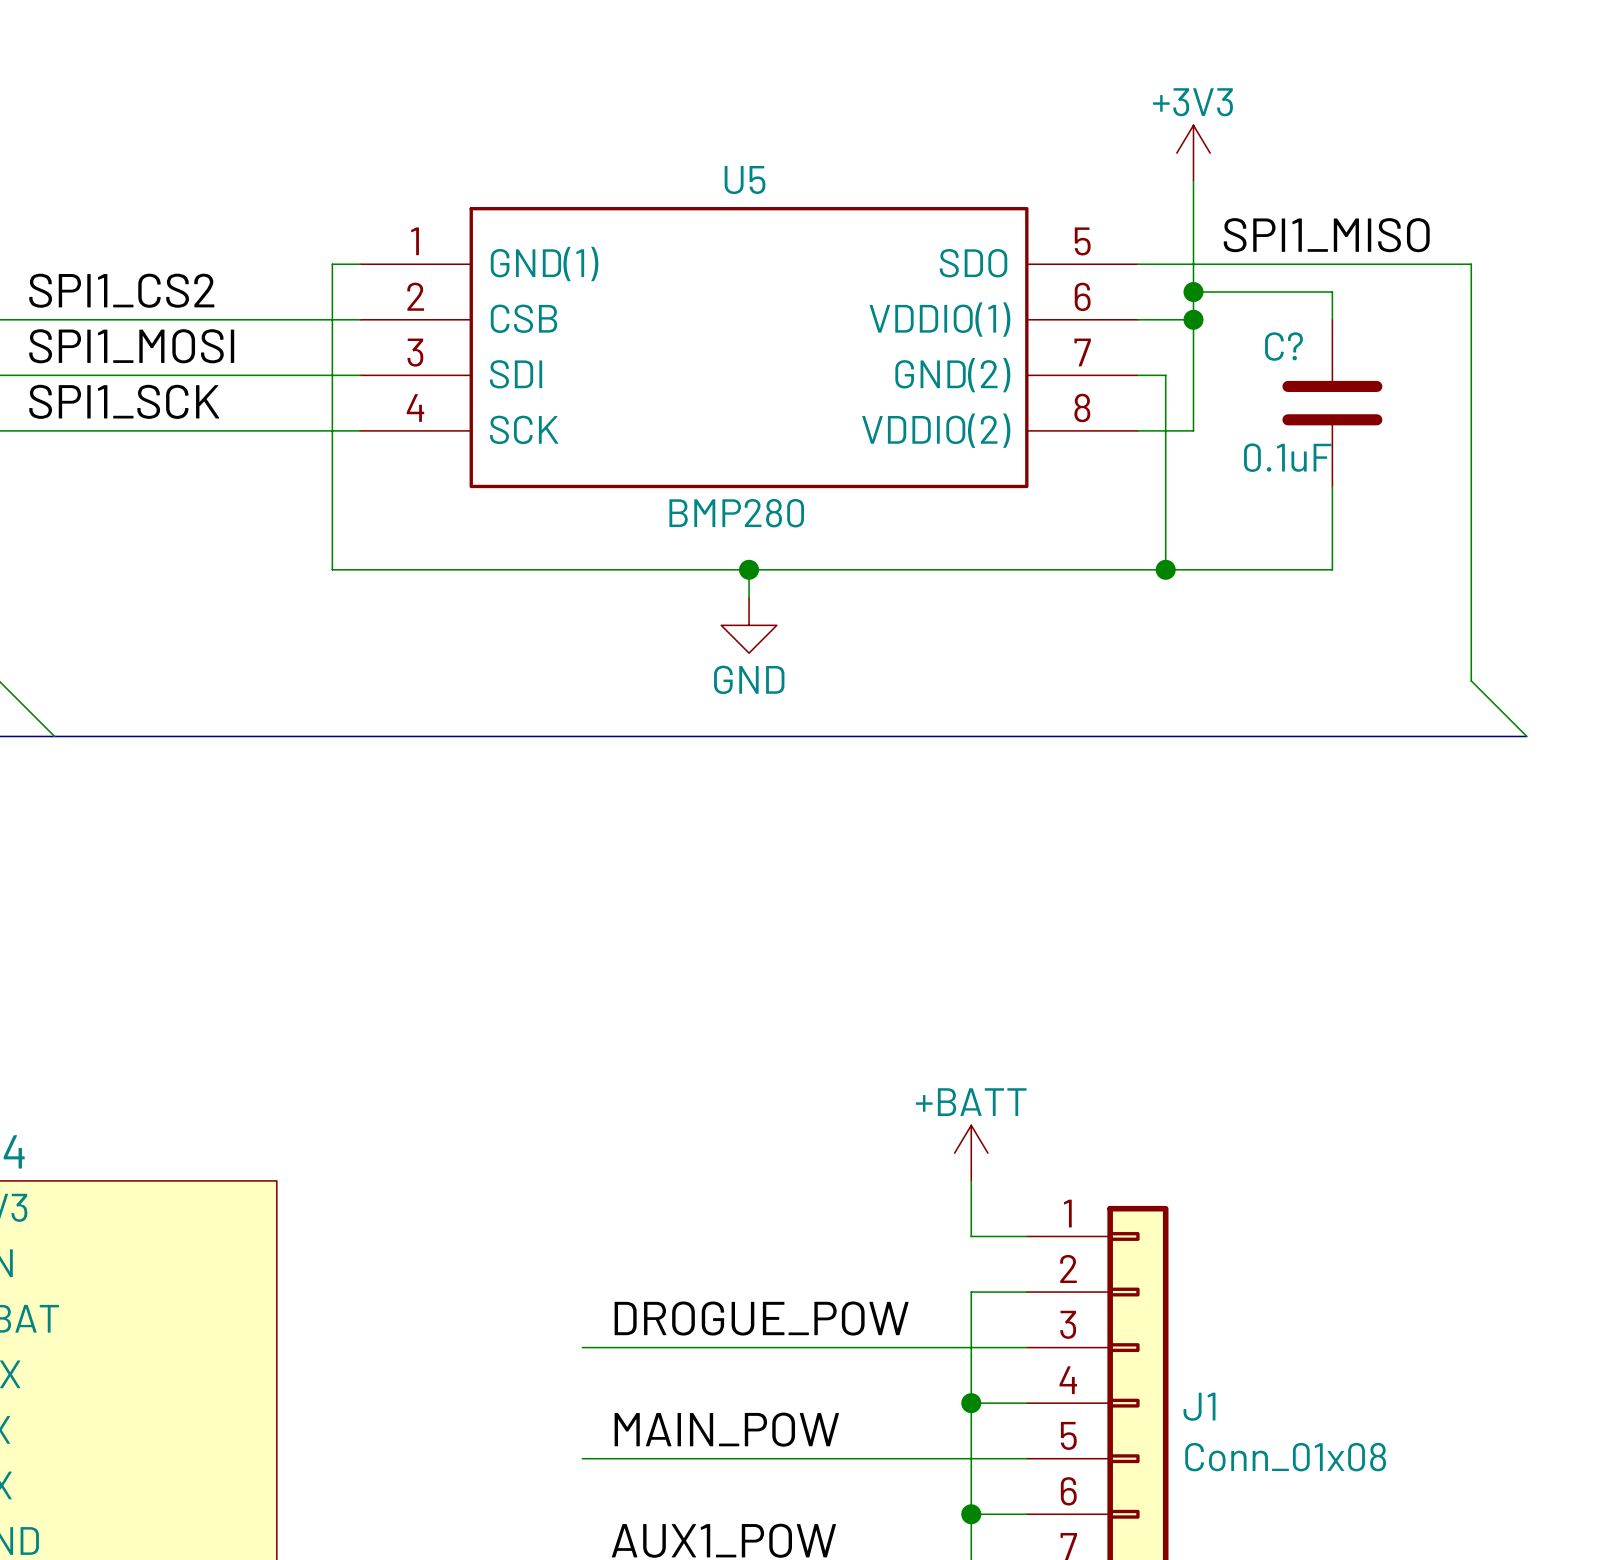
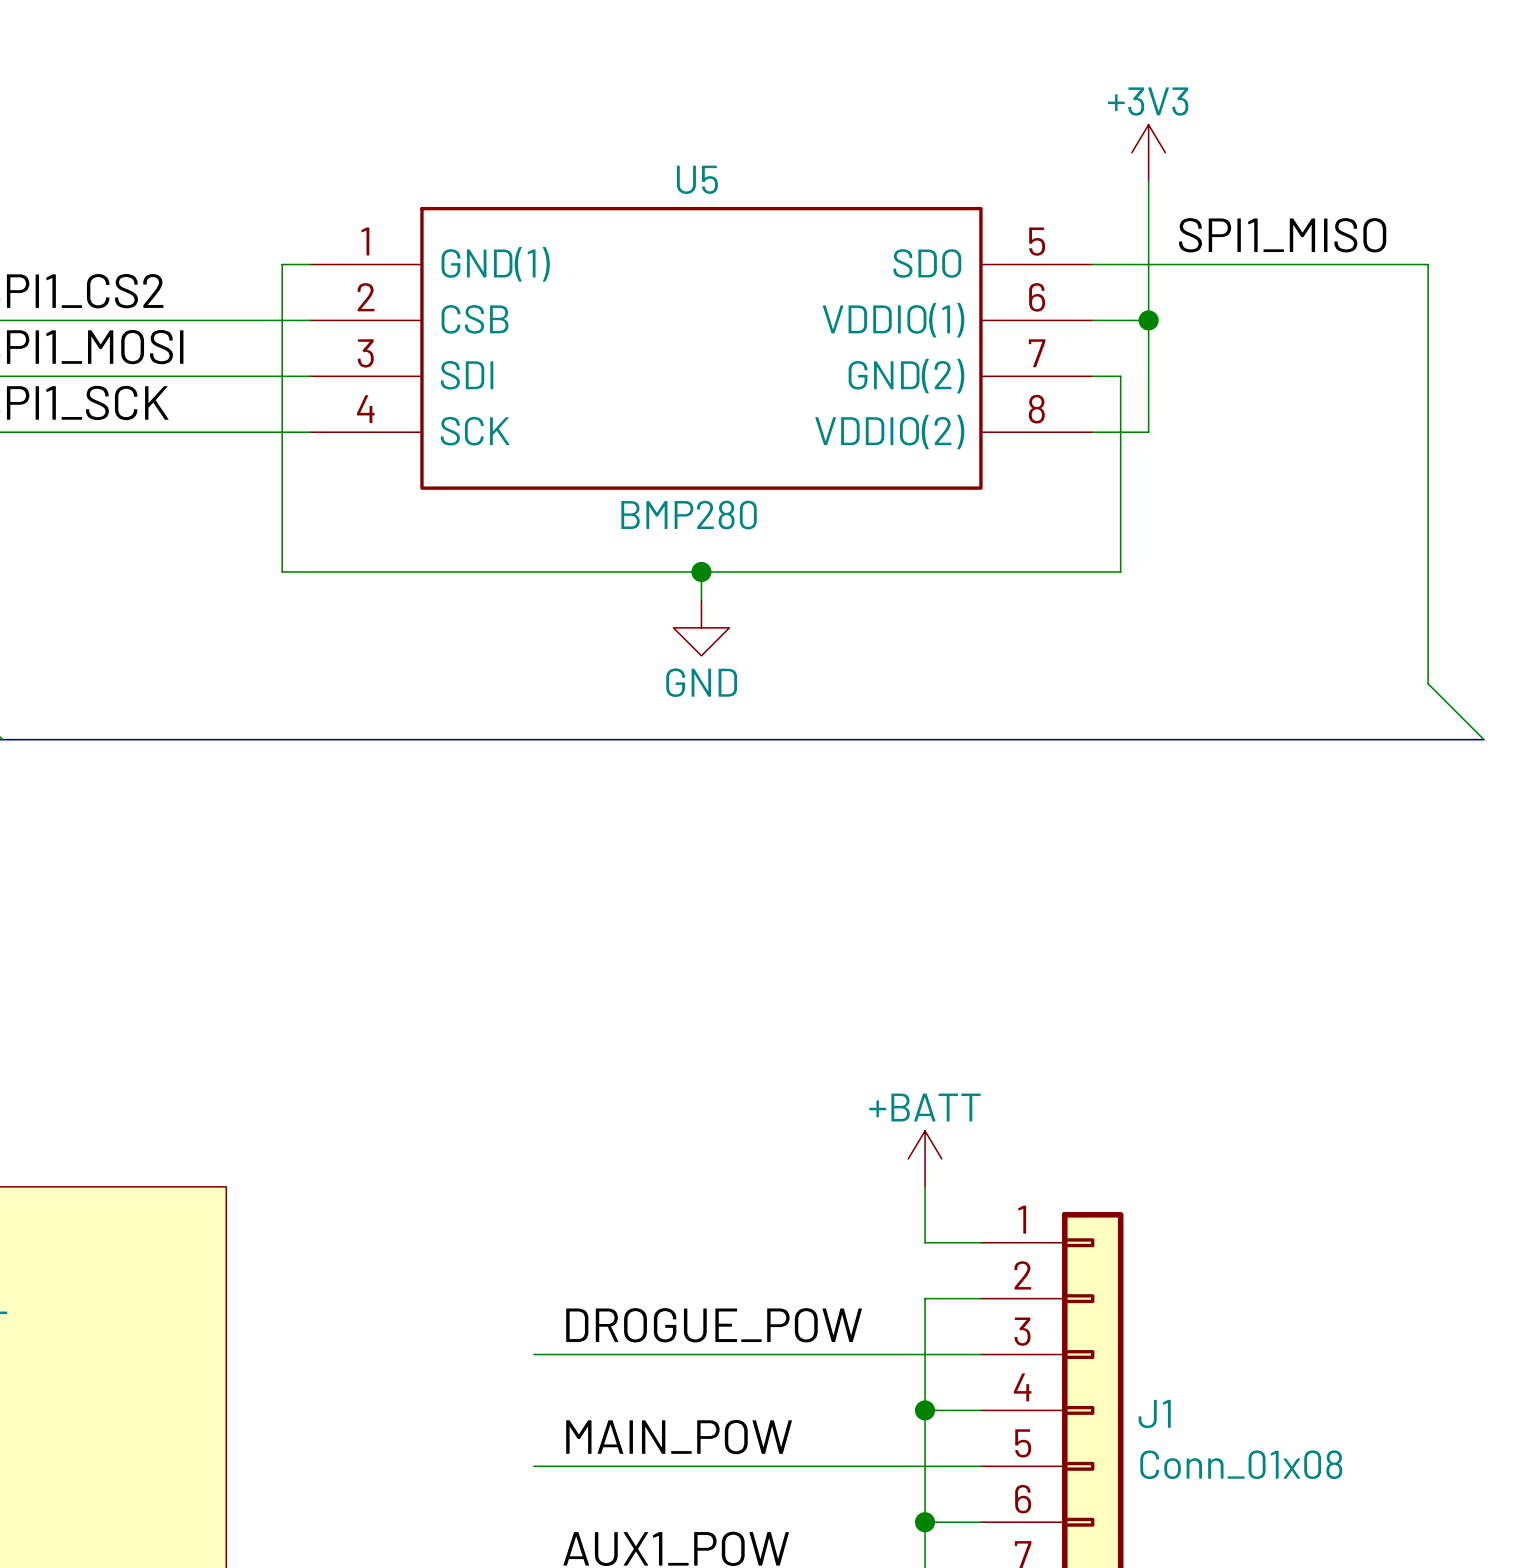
wire: (1193, 292) (1332, 292) (1332, 319) -> none
junction: (1193, 292) -> none
C?: 0.1uF (1332, 403) -> none
wire: (1332, 486) (1332, 569) (1165, 569) -> none
junction: (1165, 569) -> none

